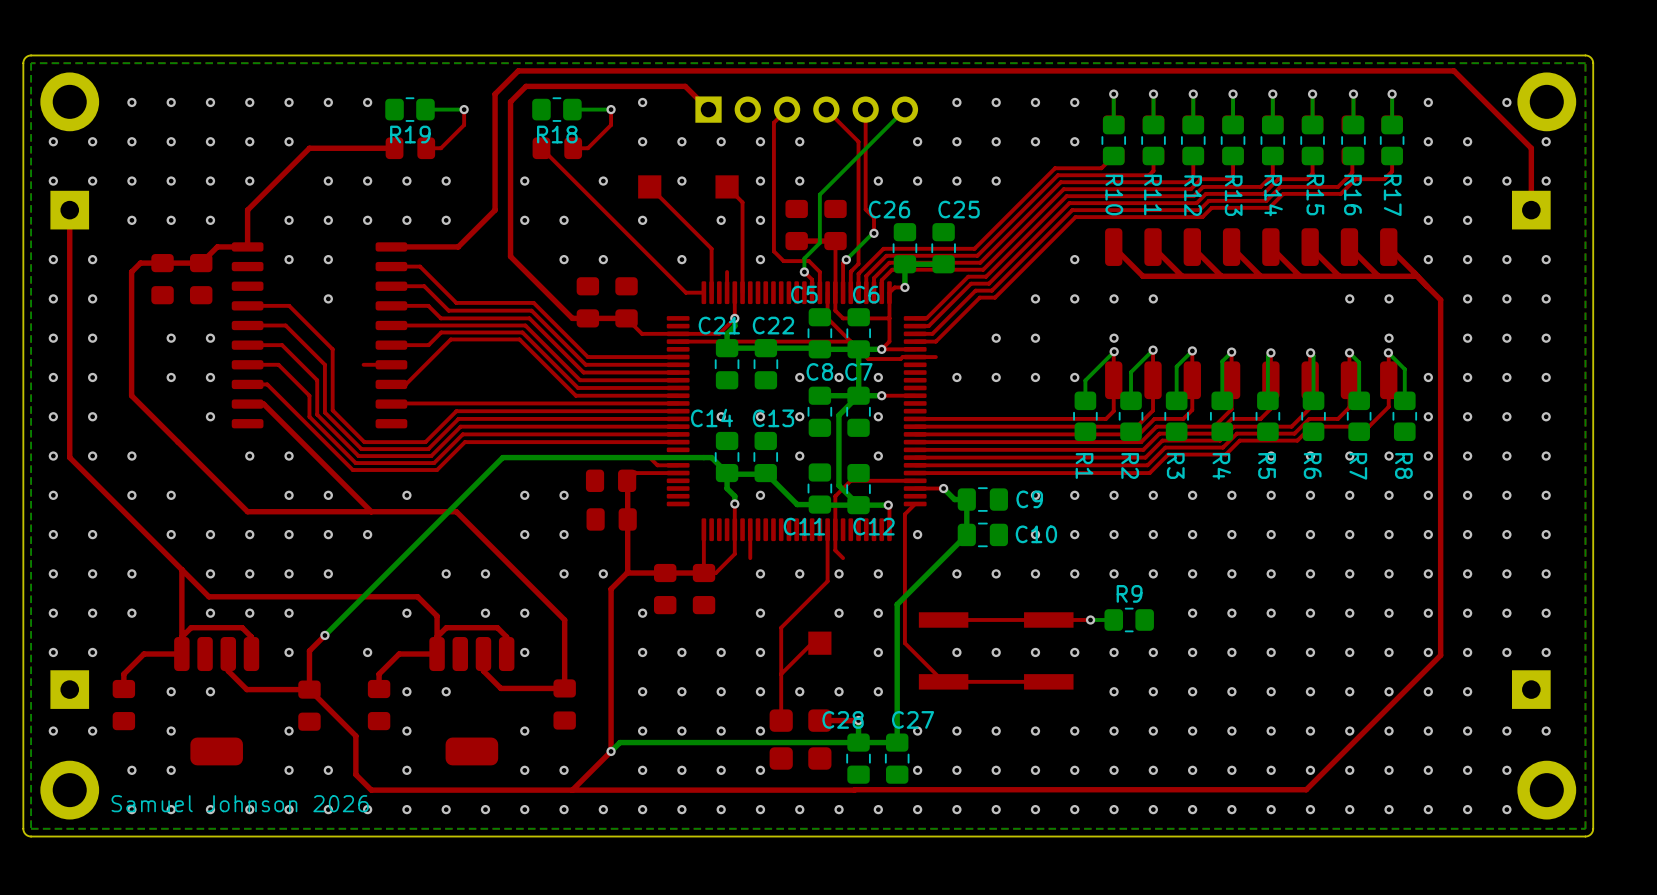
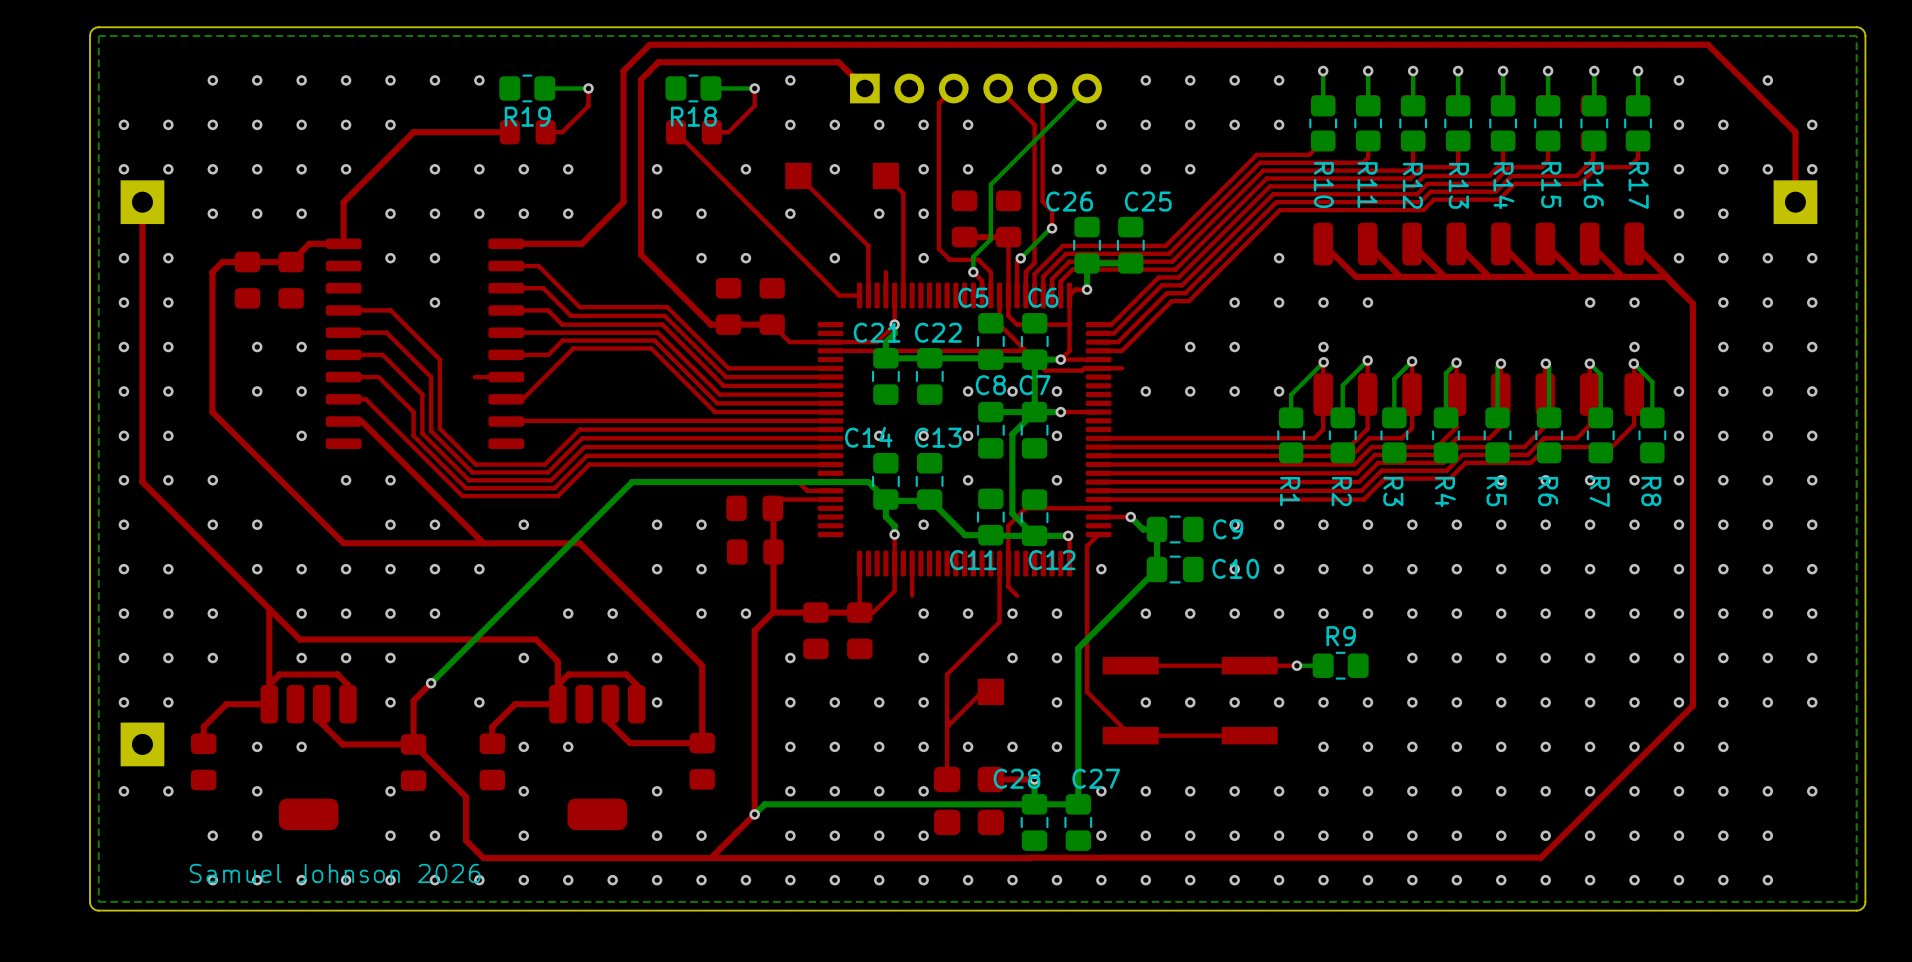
part: (69, 101) -> none
part: (1546, 101) -> none
part: (1531, 689) -> none
part: (69, 790) -> none
part: (1546, 790) -> none

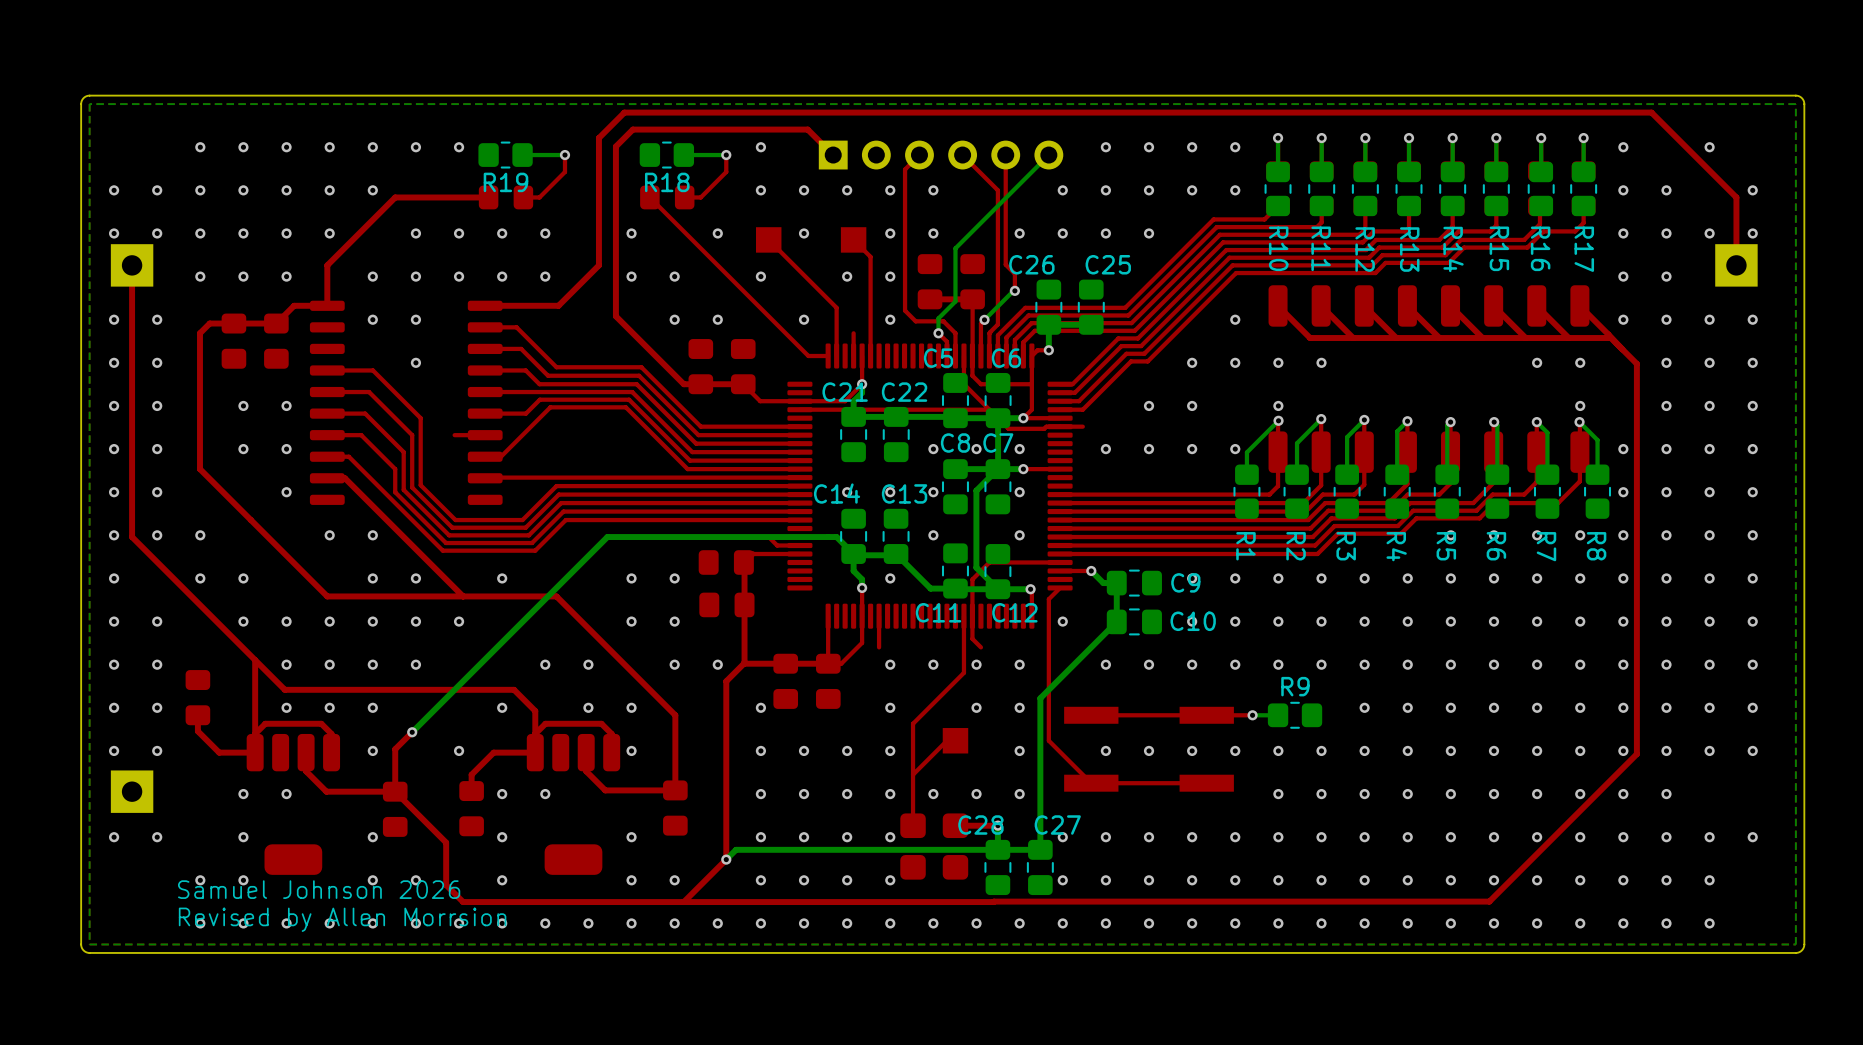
via: (212, 613) -> none
via: (212, 658) -> none
top track: (232, 704) (226, 704) (203, 726) (203, 743) -> (219, 752) (197, 731) (197, 715)
part position: (203, 761) -> (197, 697)
text: none -> Samuel Johnson 2026 (319, 889)
text: Samuel Johnson 2026 (335, 873) -> Revised by Allen Morrsion (342, 919)

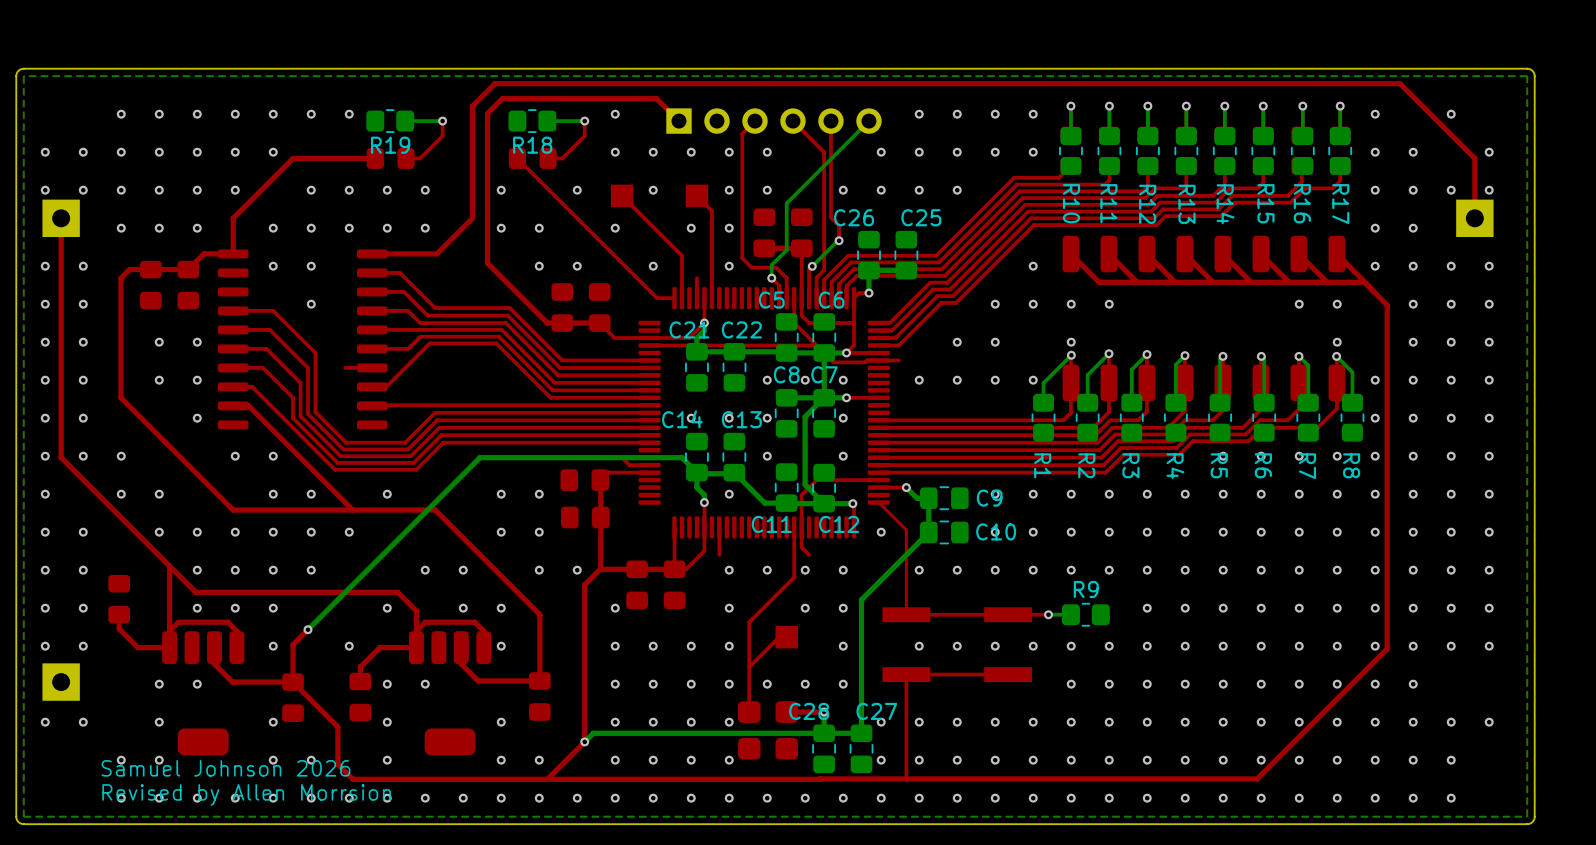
top track: (1060, 587) (1048, 599) (1048, 740) (1091, 783) -> (878, 502) (906, 530) (906, 614)
top track: none -> (906, 674) (906, 778)

